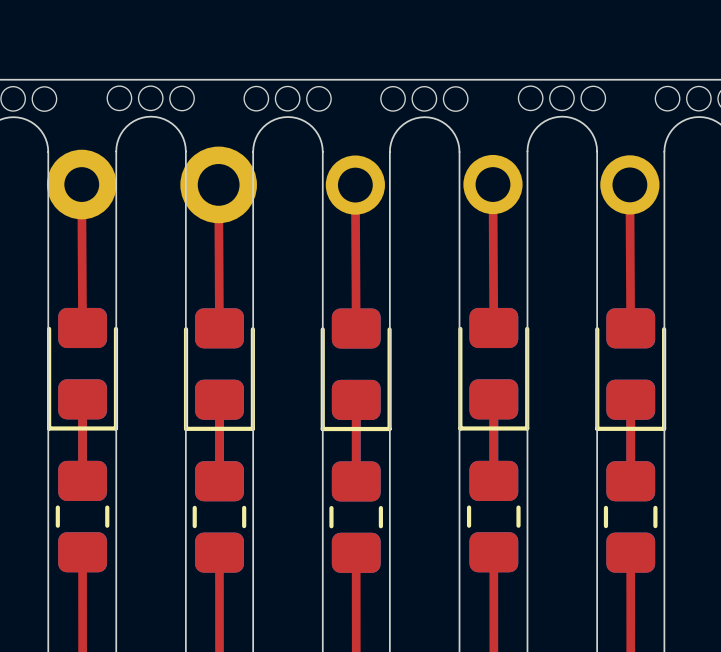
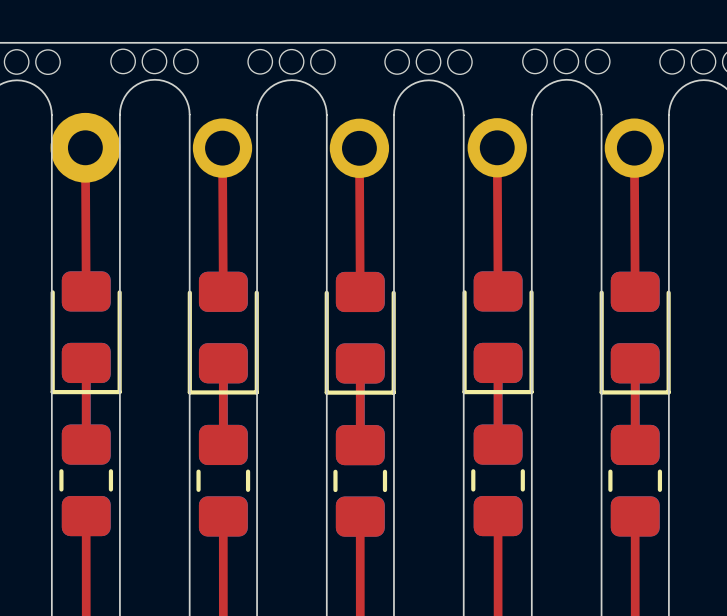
part footprint: [180, 146, 257, 224] -> [192, 118, 253, 178]

